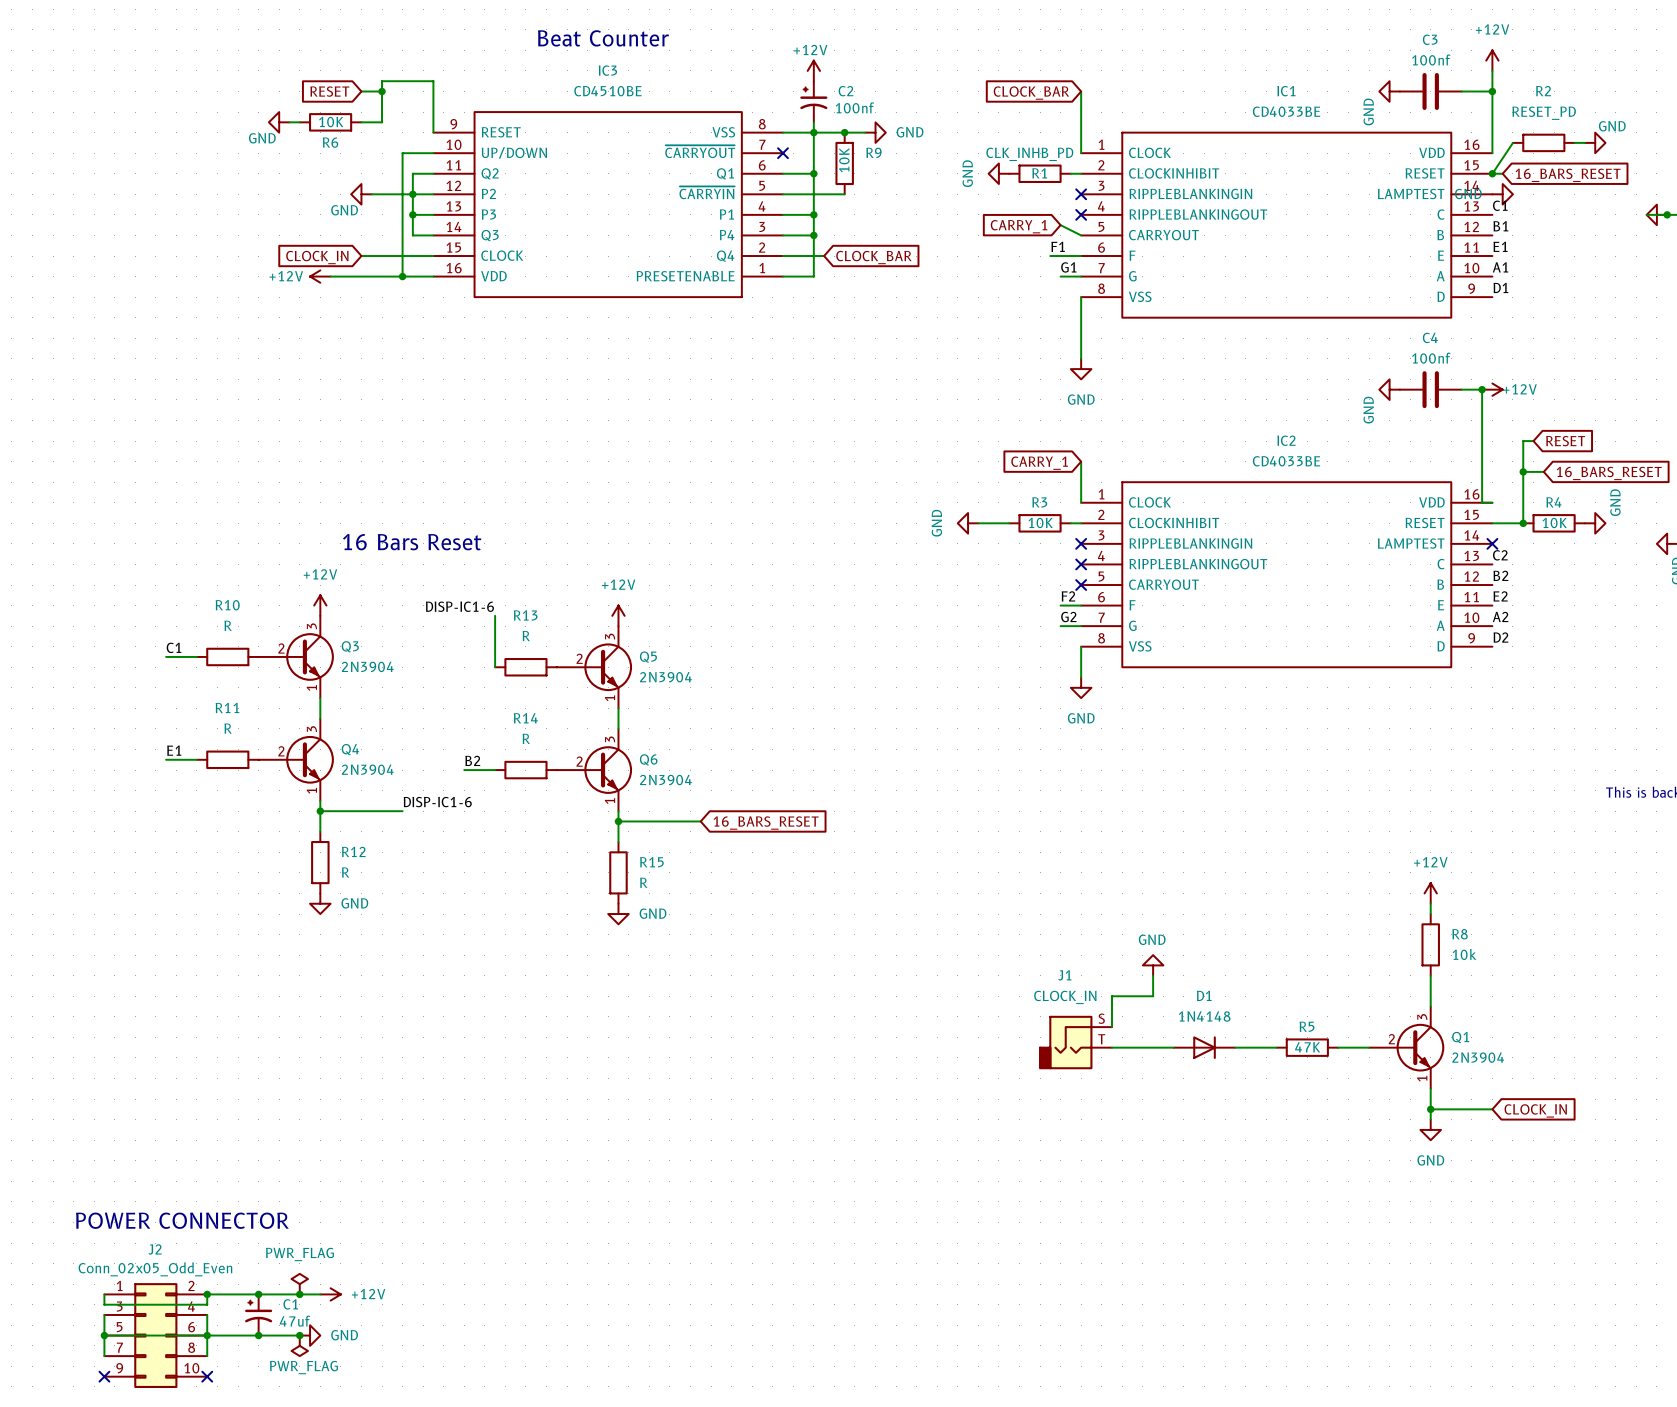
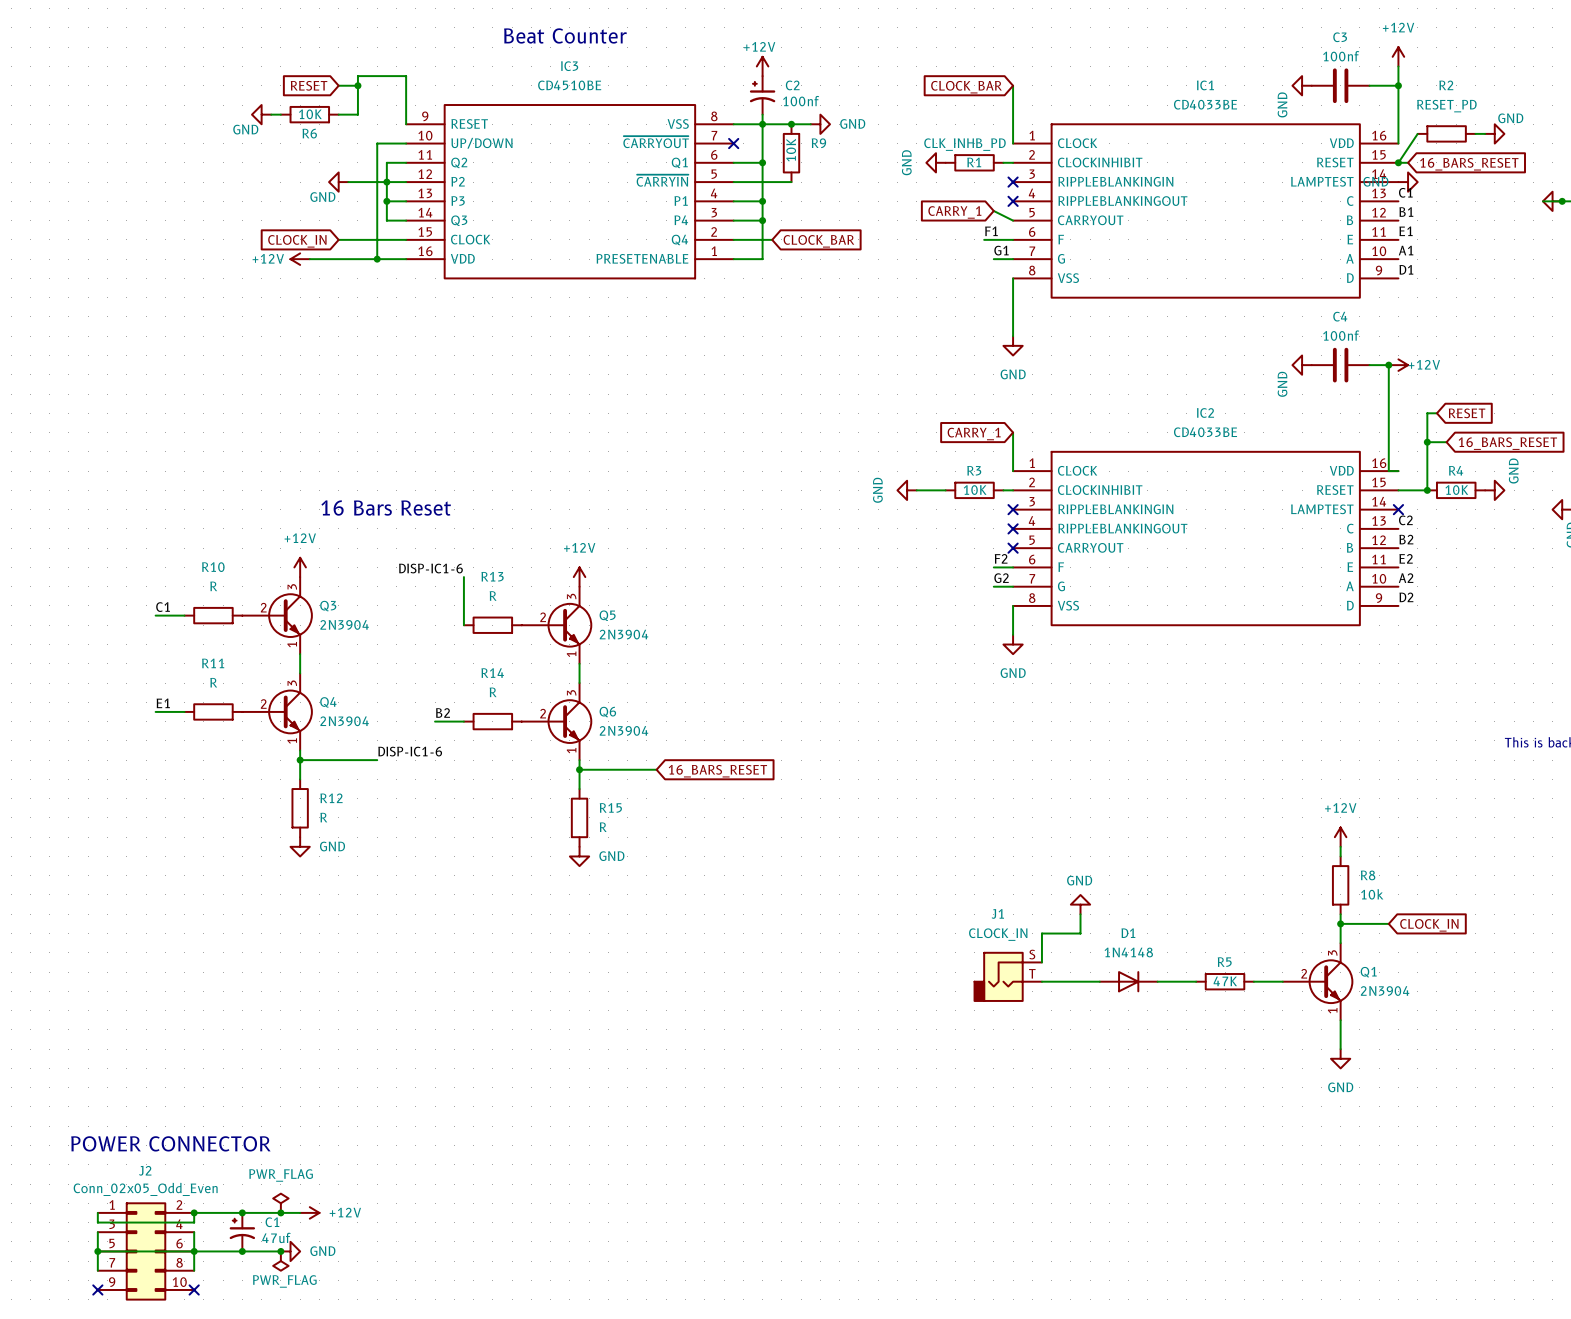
wire: none -> (1340, 923) (1388, 923)
junction: none -> (1340, 923)
wire: (1430, 1109) (1492, 1109) -> none
junction: (1430, 1109) -> none
global label position: CLOCK_IN (1535, 1110) -> CLOCK_IN (1429, 925)

